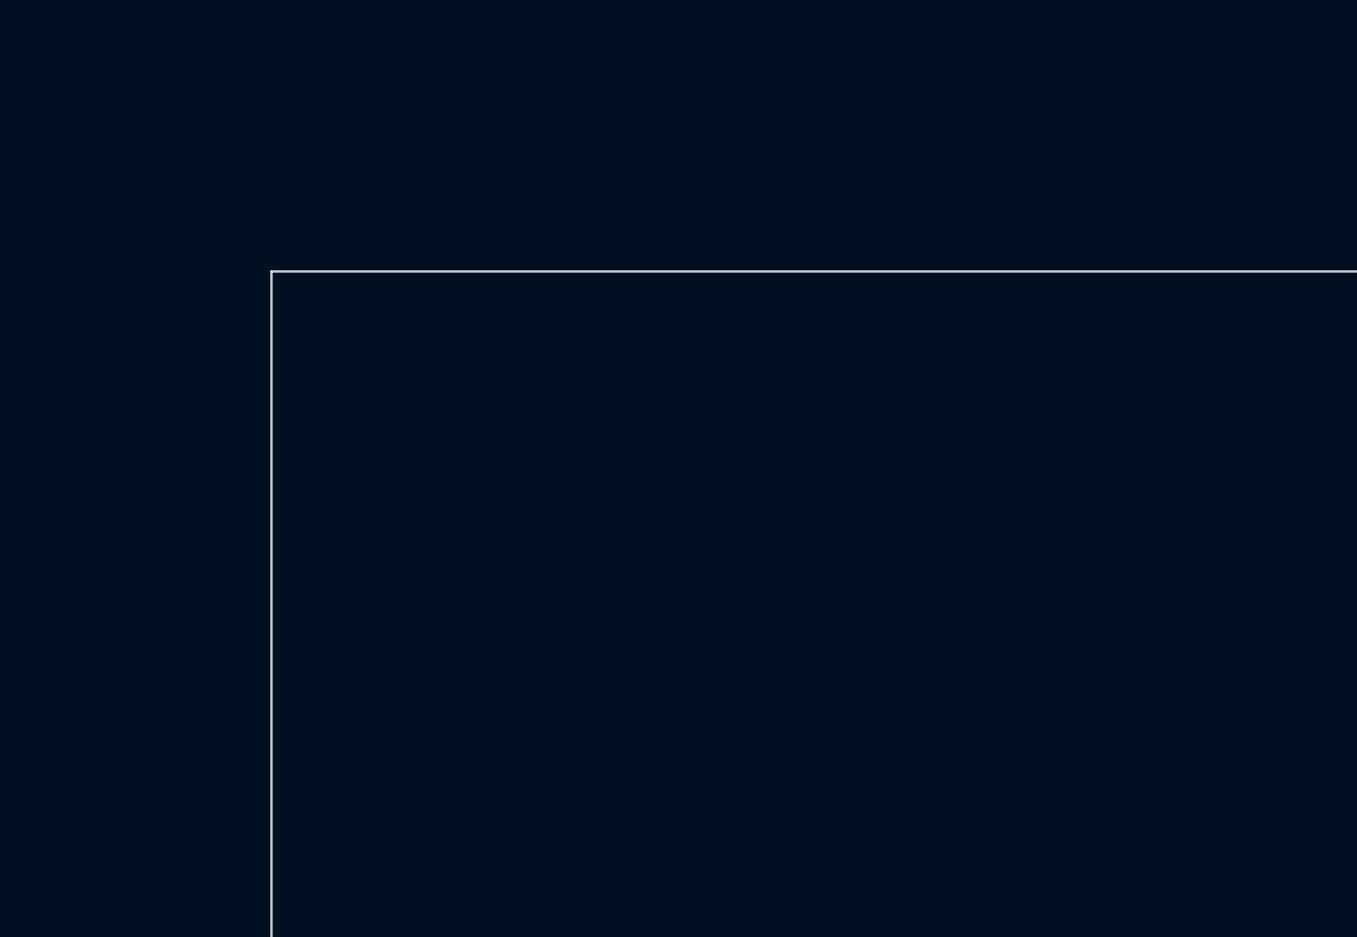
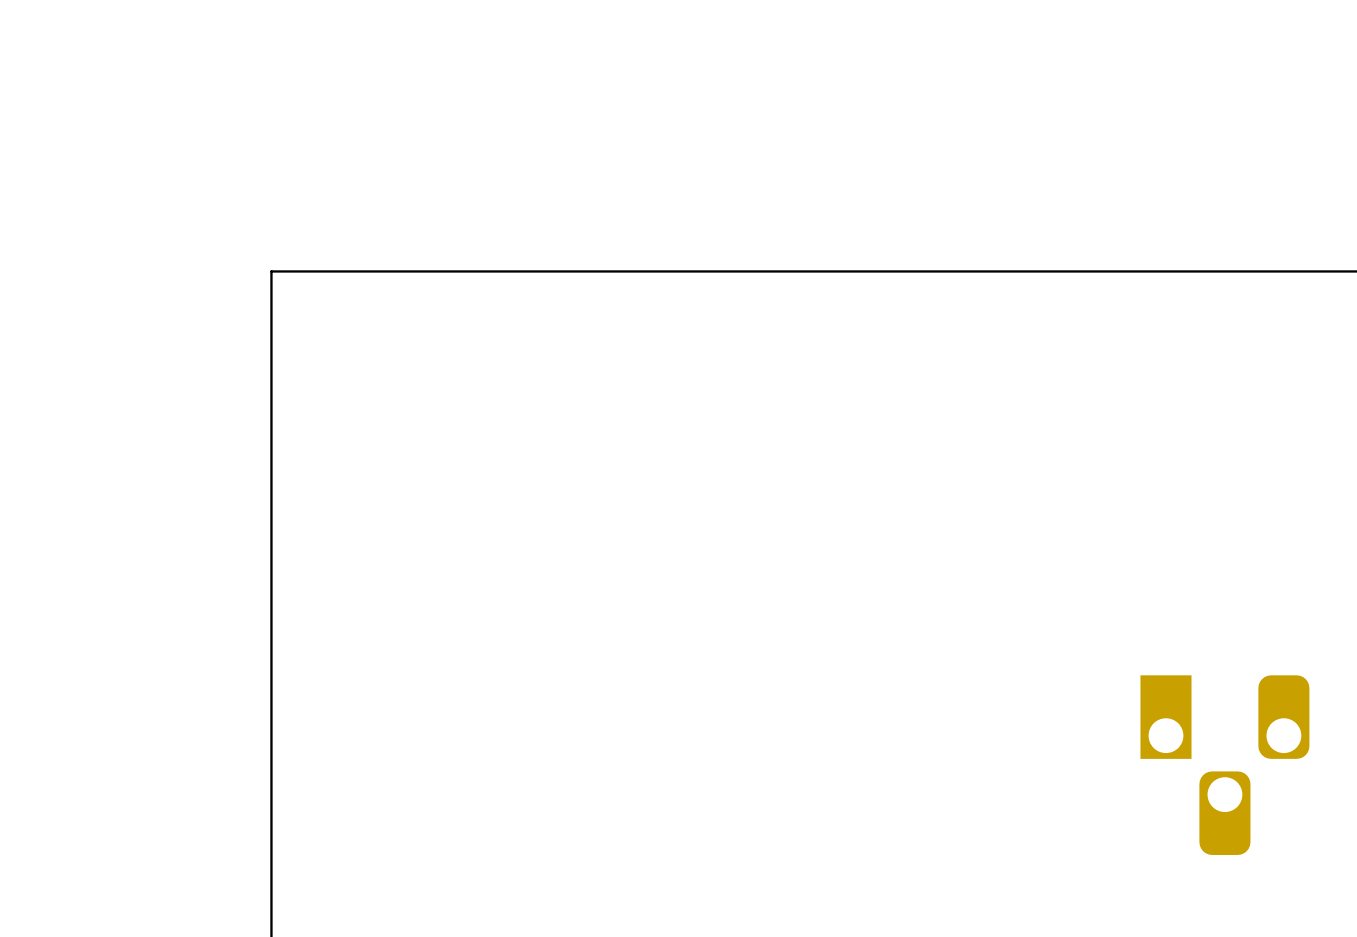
part: none -> (1224, 765)

